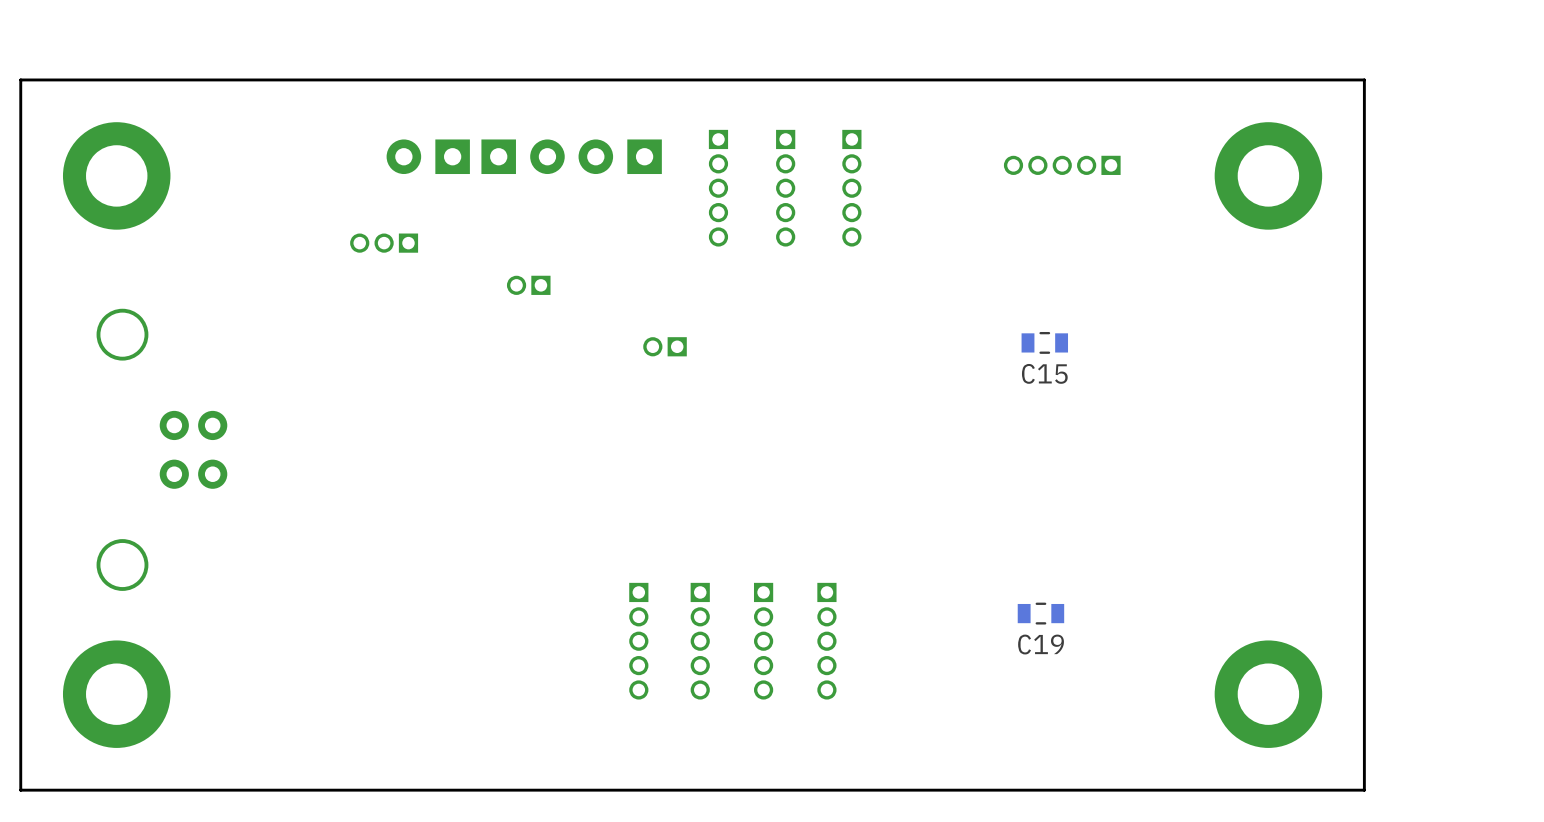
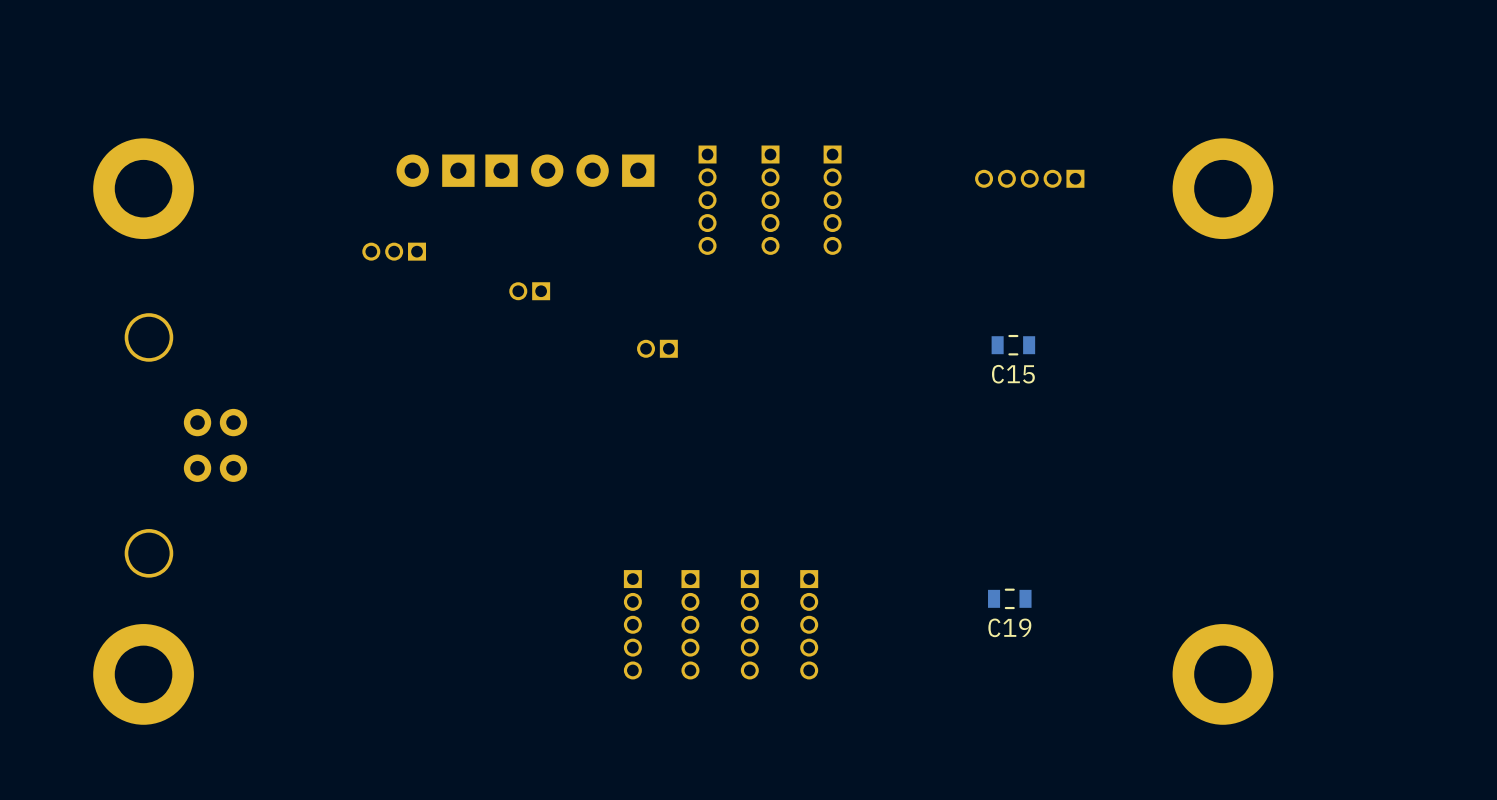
board edge: (1364, 79) (1364, 790) (20, 790) (20, 79) (1364, 79) -> none

